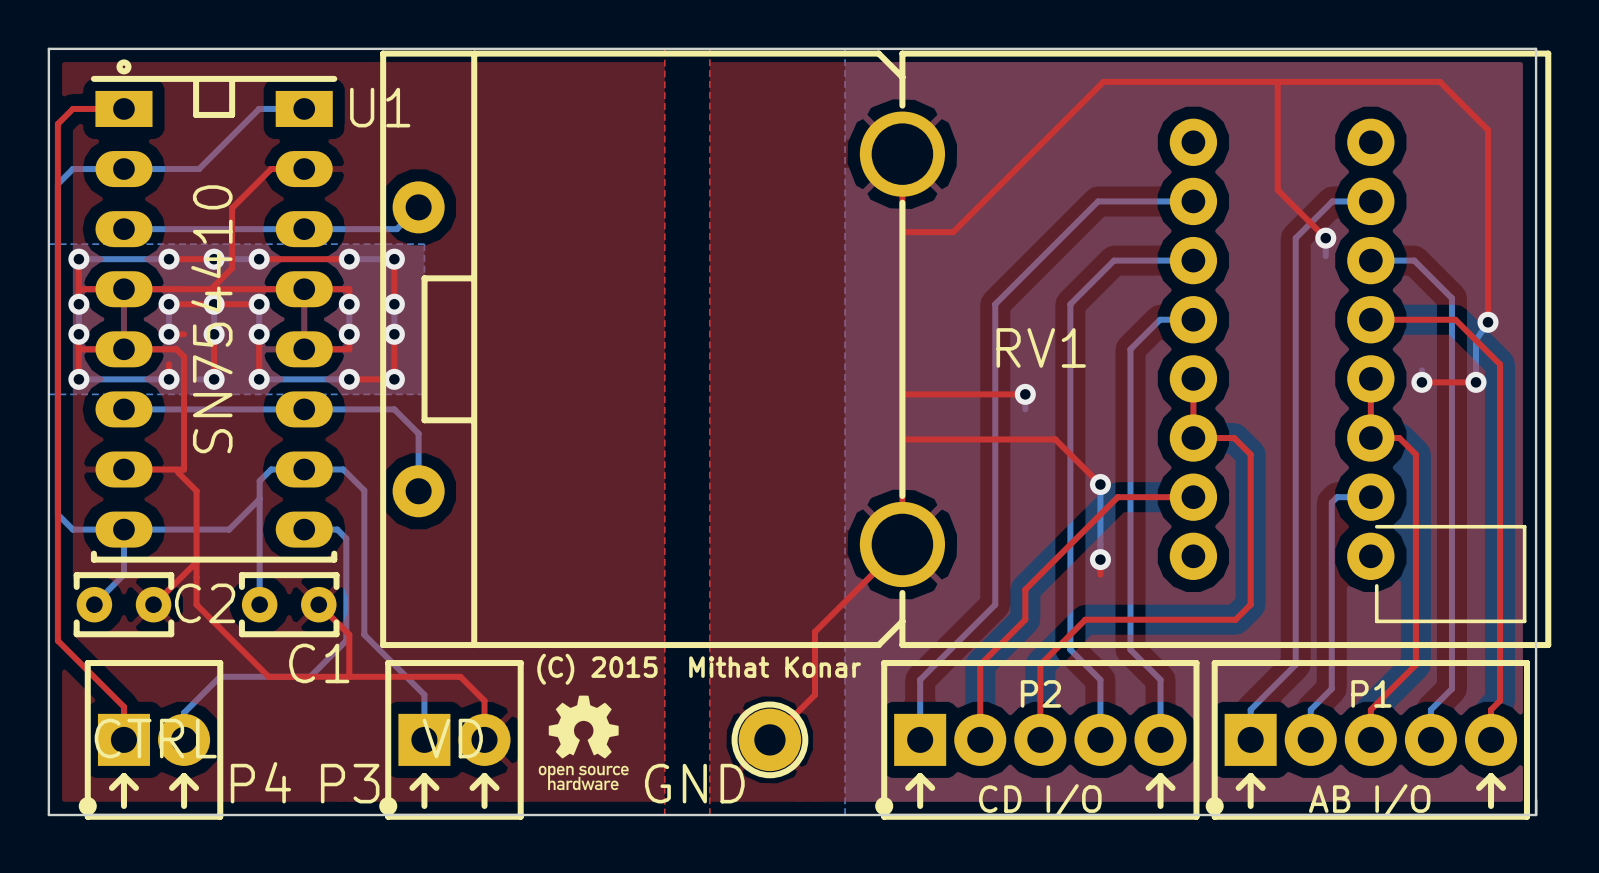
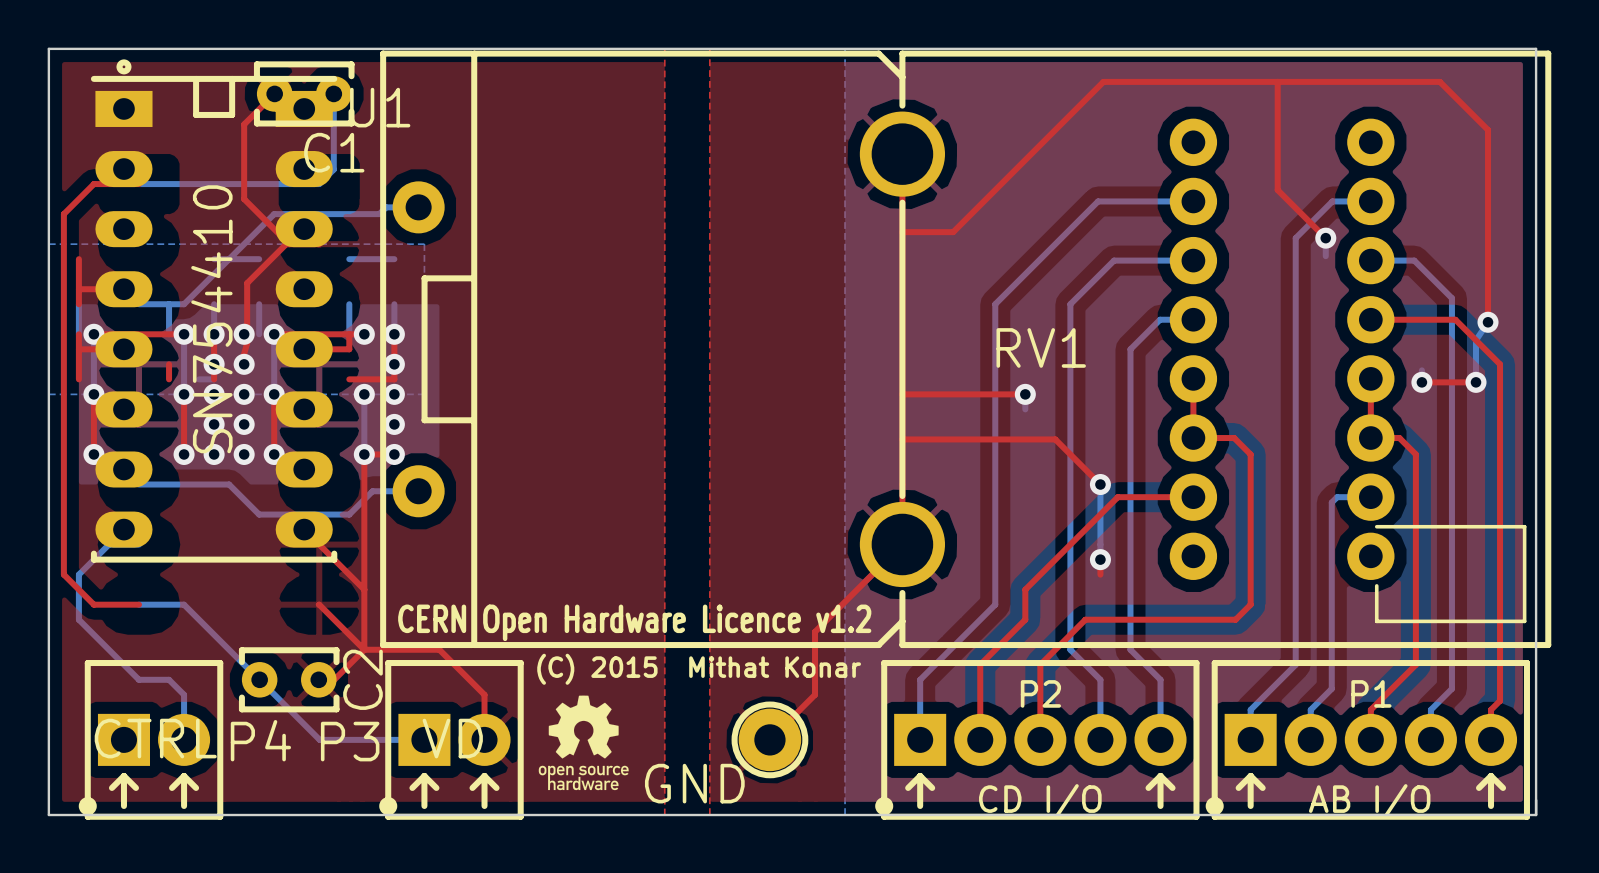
top track: none -> (274, 93) (244, 124) (244, 199) (289, 244)
bottom track: none -> (333, 93) (333, 169) (319, 184) (139, 184)
top track: (123, 108) (72, 108) (57, 123) (57, 640) (123, 706) (123, 739) -> none
bottom track: (304, 108) (259, 108) (199, 169) (72, 169) (57, 184) (57, 514) (72, 529) (229, 529) (259, 499) -> none
top track: (304, 169) (271, 169) (232, 208) (232, 268) (211, 289) -> none
top track: none -> (139, 184) (93, 184) (63, 214) (63, 574) (93, 604) (139, 604)
bottom track: (418, 207) (396, 229) (123, 229) -> (418, 207) (386, 207) (379, 214) (274, 214) (184, 304) (139, 304)
top track: none -> (319, 244) (286, 244) (247, 283) (247, 343) (241, 364)
bottom track: (78, 259) (169, 259) -> none
via: (78, 259) -> none
top track: (169, 259) (214, 259) -> none
via: (169, 259) -> none
via: (214, 259) -> none
top track: (259, 259) (349, 259) -> (274, 334) (364, 334)
via: (259, 259) -> none
via: (349, 259) -> none
top track: (394, 259) (394, 304) -> none
via: (394, 259) -> none
top track: (139, 289) (349, 289) (349, 304) -> none
via: (78, 304) -> none
top track: (169, 304) (259, 304) -> none
via: (169, 304) -> none
via: (214, 304) -> none
via: (259, 304) -> none
via: (349, 304) -> none
via: (394, 304) -> none
via position: (78, 334) -> (93, 334)
bottom track: none -> (93, 334) (93, 394)
top track: none -> (93, 334) (169, 334)
via position: (169, 334) -> (184, 334)
bottom track: none -> (184, 334) (184, 394)
via: none -> (244, 334)
top track: (259, 334) (259, 379) -> none
via: (259, 334) -> none
bottom track: none -> (274, 334) (274, 394)
via: none -> (274, 334)
via position: (349, 334) -> (364, 334)
top track: (139, 349) (176, 349) (184, 356) (184, 394) -> none
via: none -> (214, 364)
via: none -> (244, 364)
via: none -> (394, 364)
bottom track: (78, 379) (169, 379) -> none
via position: (78, 379) -> (93, 394)
via position: (169, 379) -> (184, 394)
via: (214, 379) -> none
bottom track: (259, 379) (349, 379) -> none
via: (259, 379) -> none
via position: (349, 379) -> (364, 394)
via: (394, 379) -> none
top track: none -> (93, 394) (93, 454)
via: none -> (214, 394)
via: none -> (244, 394)
top track: none -> (274, 394) (274, 454)
via: none -> (274, 394)
bottom track: none -> (364, 394) (364, 454)
via: none -> (394, 394)
bottom track: (123, 409) (394, 409) (418, 433) (418, 491) -> (139, 484) (229, 484) (259, 514) (349, 514) (372, 491) (418, 491)
via: none -> (214, 424)
via: none -> (244, 424)
via: none -> (394, 424)
via: none -> (93, 454)
top track: (184, 454) (184, 469) (139, 469) -> none
via: none -> (184, 454)
via: none -> (214, 454)
via: none -> (244, 454)
via: none -> (274, 454)
via: none -> (364, 454)
top track: none -> (394, 454) (364, 454) (364, 649)
via: none -> (394, 454)
top track: (178, 472) (196, 491) (196, 604) (268, 676) (460, 676) (484, 700) -> (364, 649) (439, 649) (484, 694) (484, 700)
bottom track: (123, 529) (123, 574) (94, 604) -> none
bottom track: (304, 529) (337, 529) (346, 538) (346, 640) (310, 676) (220, 676) (184, 712) -> (139, 544) (108, 544) (78, 574) (78, 619) (139, 679) (169, 679) (184, 694) (184, 712)
top track: none -> (319, 544) (364, 589)
top track: (196, 562) (153, 604) -> none
C2 name rotation: 0° (205, 603) -> 90° counterclockwise (362, 679)
C2 position: (123, 604) -> (289, 679)
bottom track: (259, 604) (259, 481) (271, 469) (343, 469) (364, 490) (364, 634) (424, 694) (424, 739) -> (139, 604) (184, 604) (319, 739) (424, 739)
C1 position: (289, 604) -> (304, 93)
text: none -> CERN Open Hardware Licence v1.2 (634, 622)
top track: (349, 634) (349, 676) -> (349, 634) (364, 649)
top track: none -> (364, 649) (334, 679)
P4 name position: P4 (260, 782) -> P4 (260, 740)
P3 name position: P3 (350, 783) -> P3 (350, 741)

